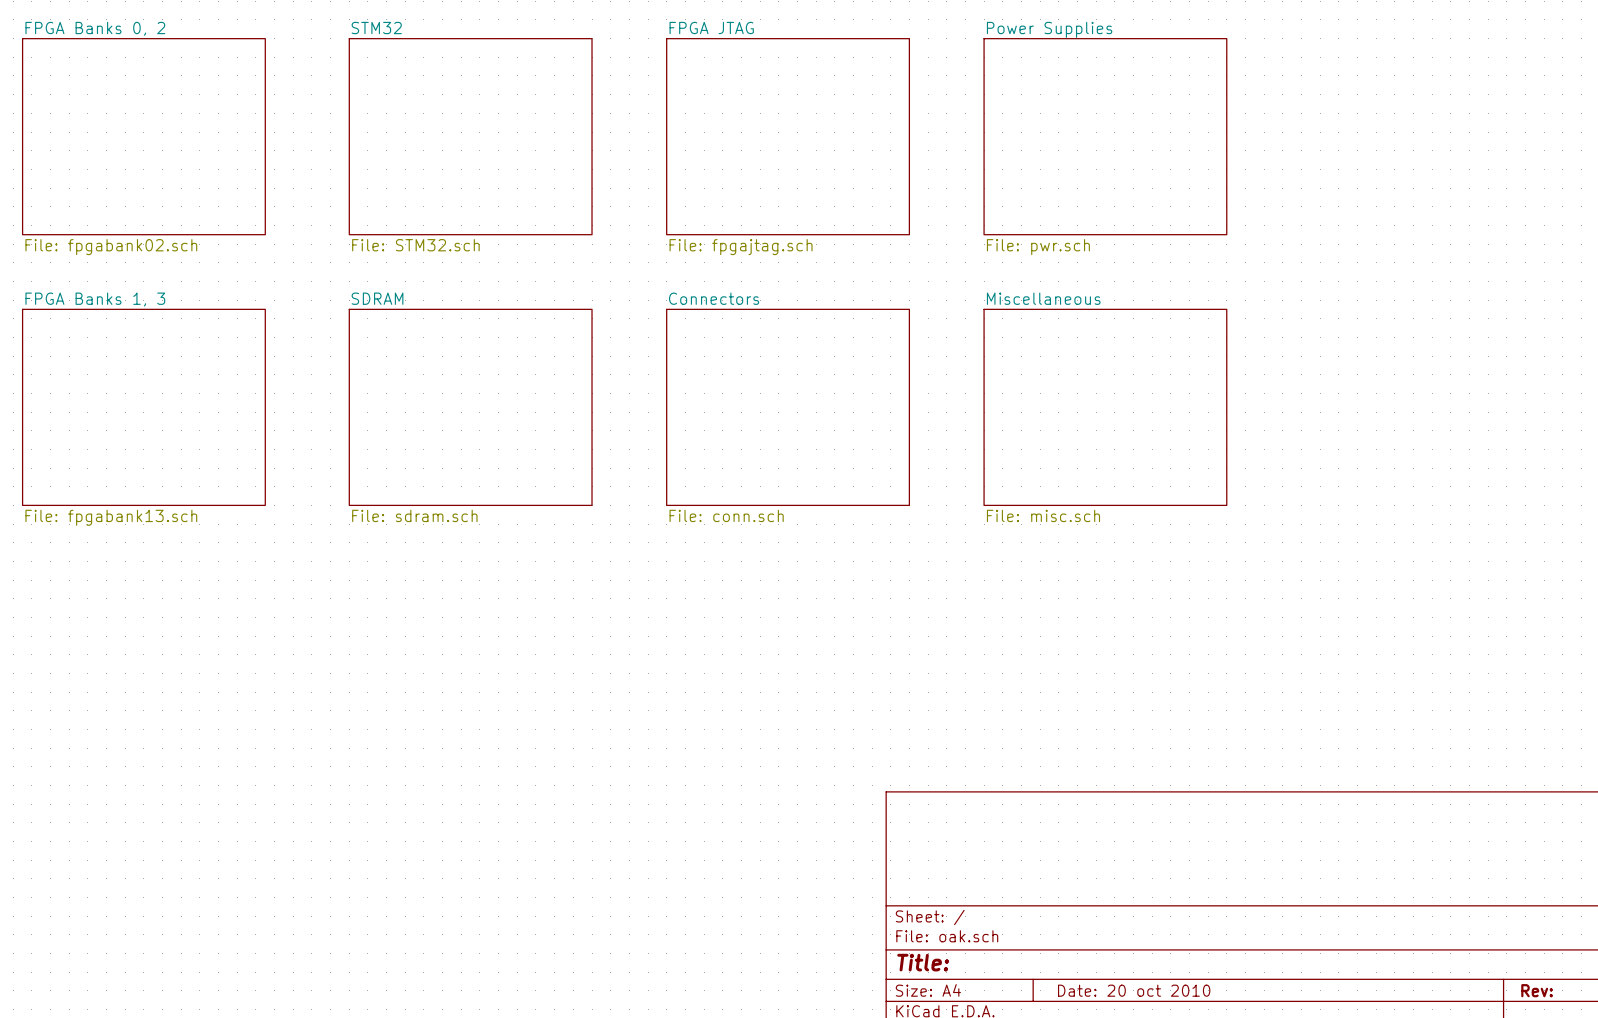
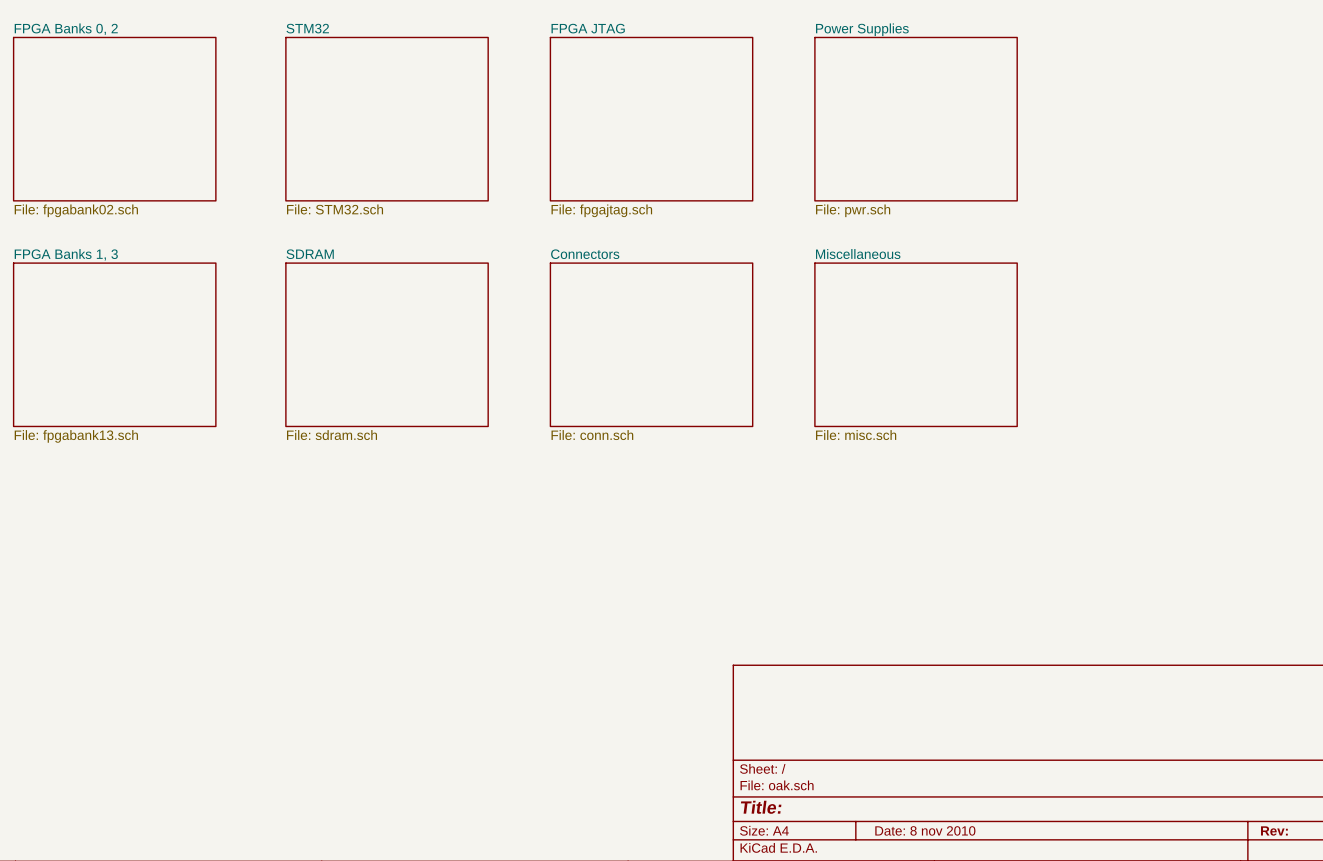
title block: Date: 20 oct 2010 (1134, 990) -> Date: 8 nov 2010 (925, 830)

